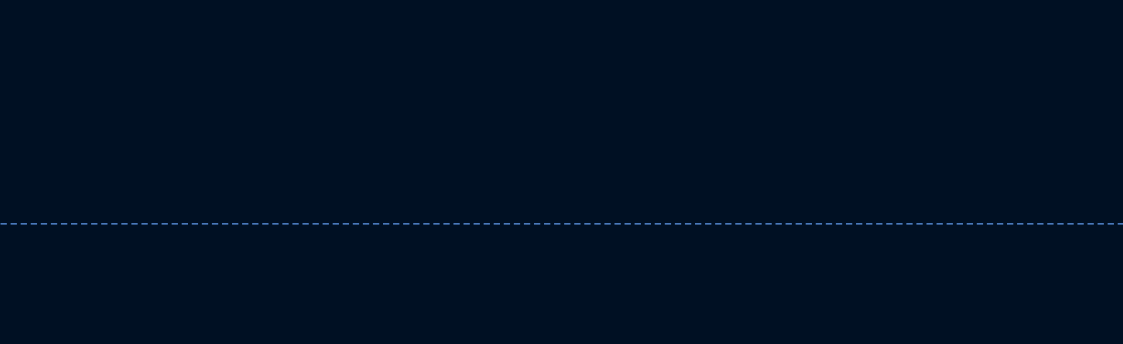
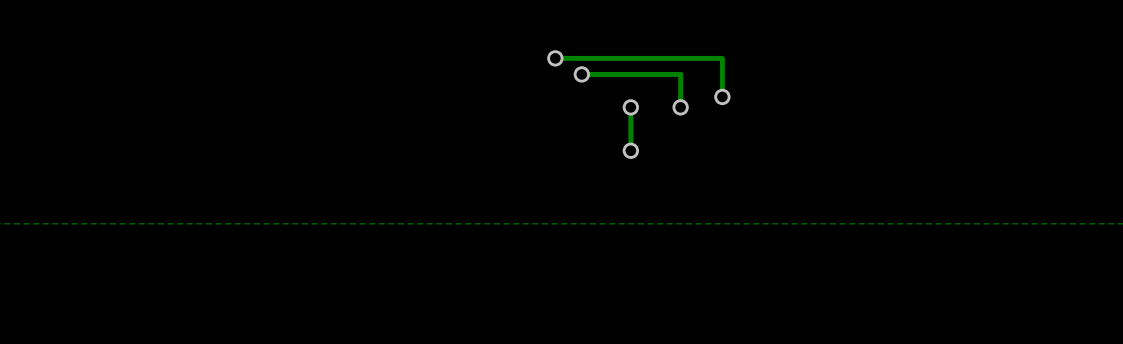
track: none -> (555, 58) (721, 58) (722, 96)
via: none -> (555, 58)
track: none -> (581, 73) (680, 74) (680, 107)
via: none -> (581, 74)
via: none -> (722, 96)
track: none -> (630, 107) (630, 150)
via: none -> (630, 107)
via: none -> (680, 107)
via: none -> (630, 150)

